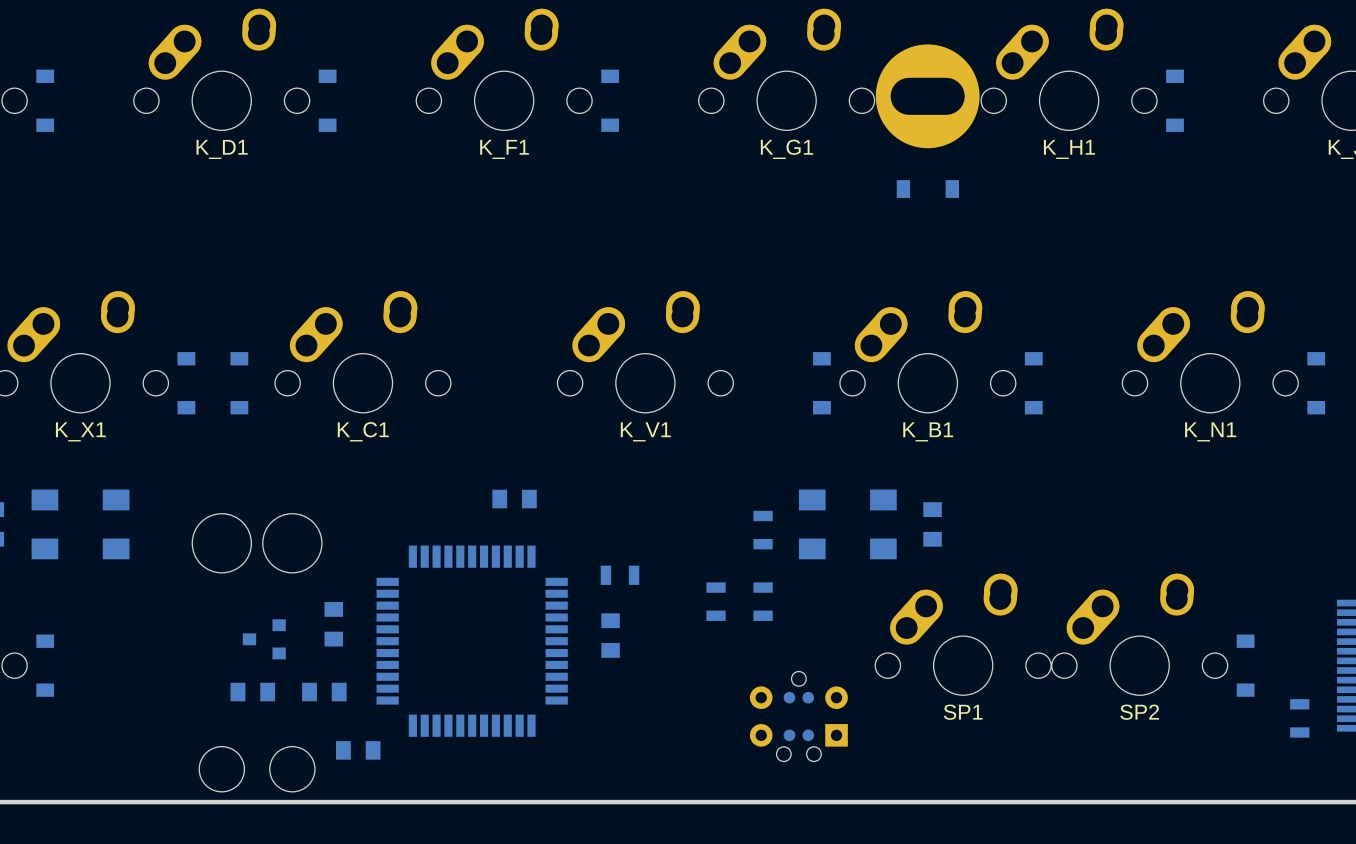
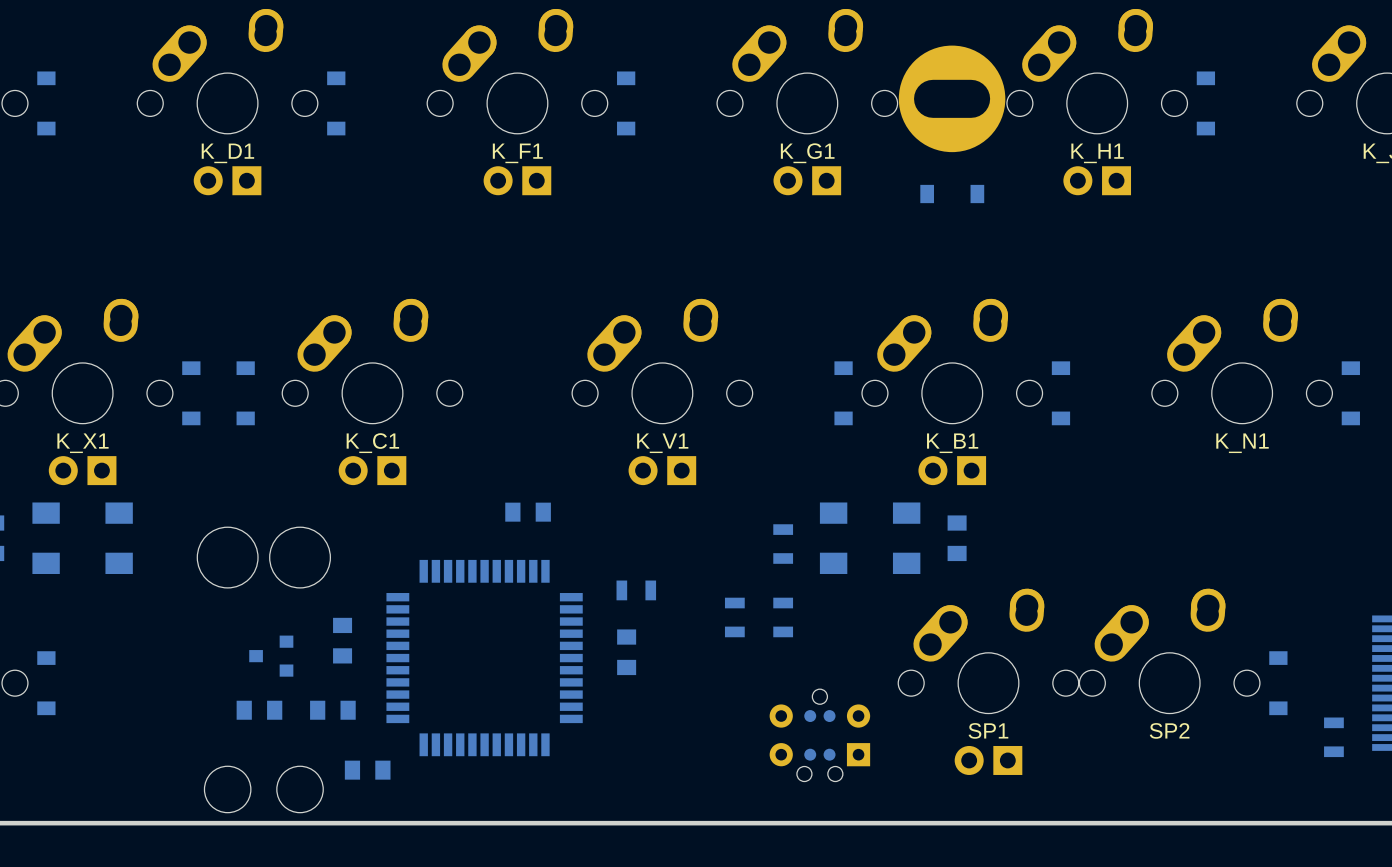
part: none -> (227, 180)
part: none -> (517, 180)
part: none -> (807, 180)
part: none -> (1097, 180)
part: none -> (82, 470)
part: none -> (372, 470)
part: none -> (662, 470)
part: none -> (952, 470)
part: none -> (988, 760)

